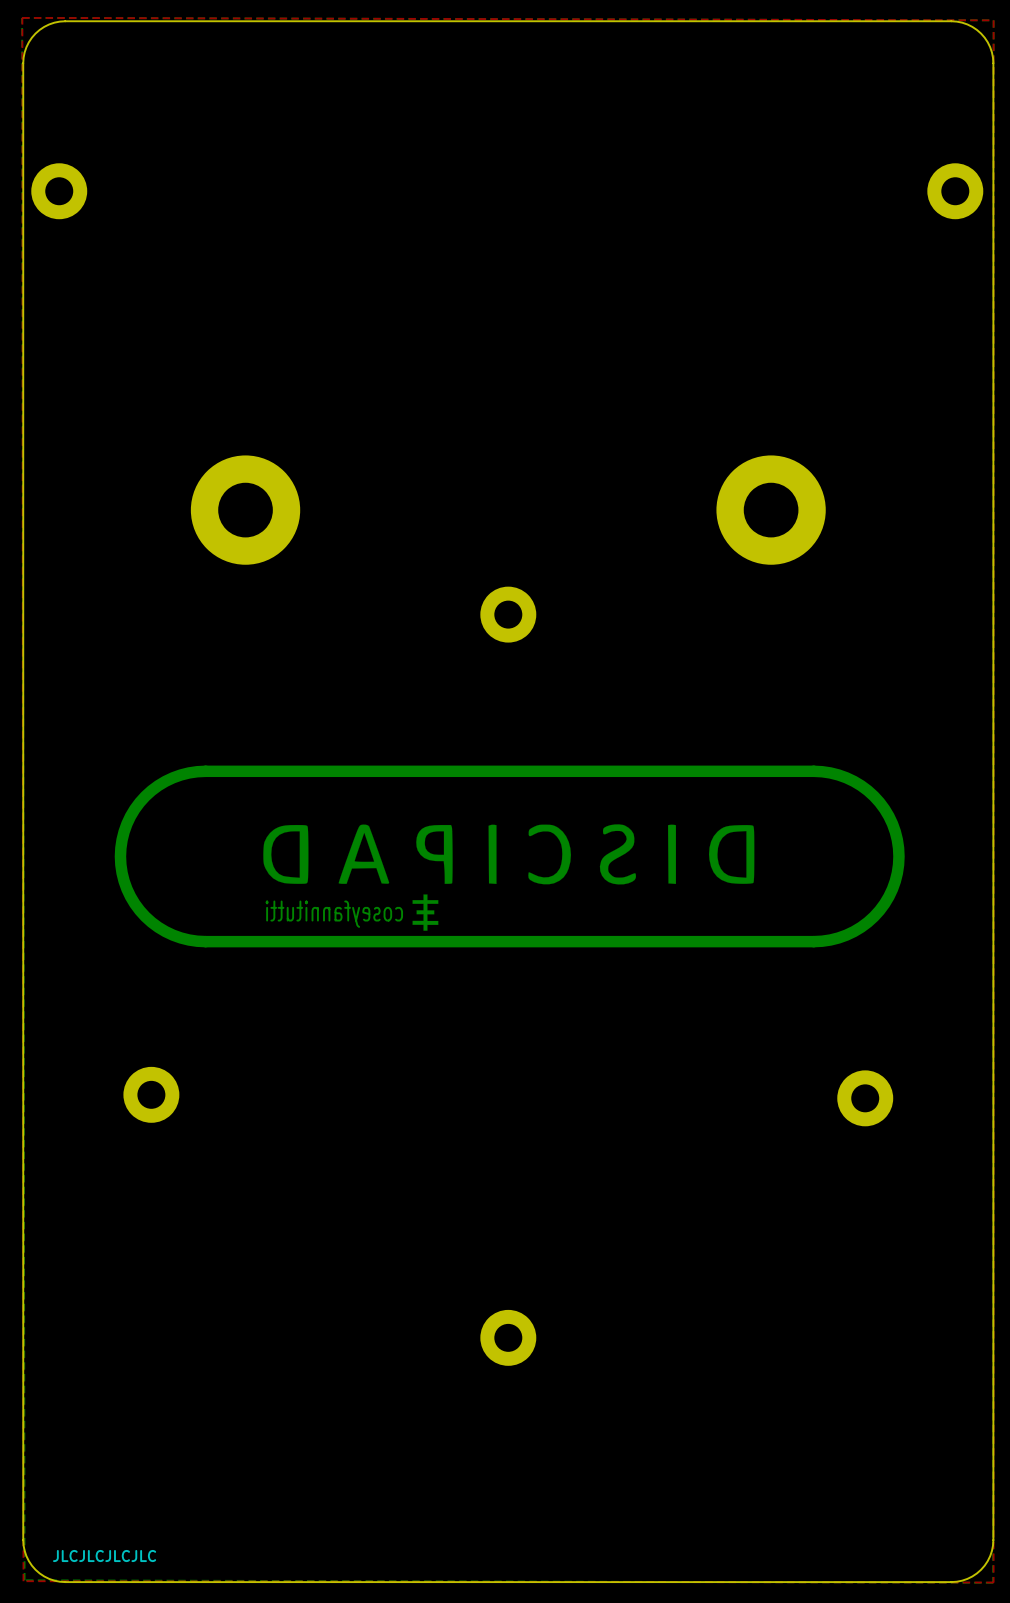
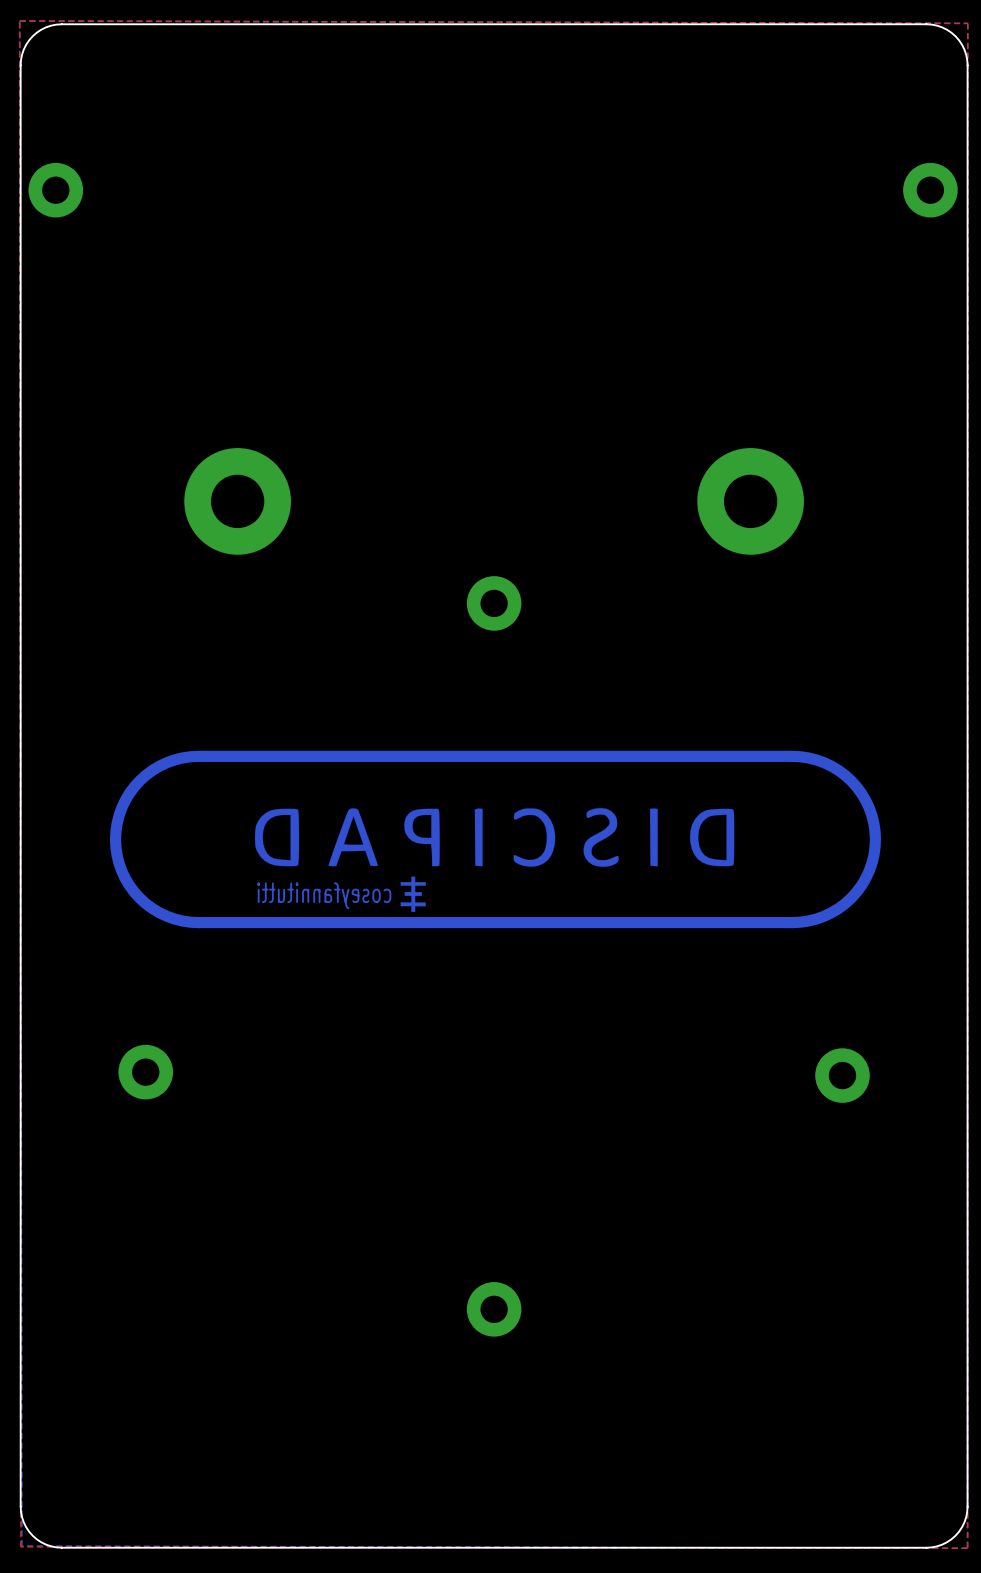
text: JLCJLCJLCJLC (104, 1556) -> none

